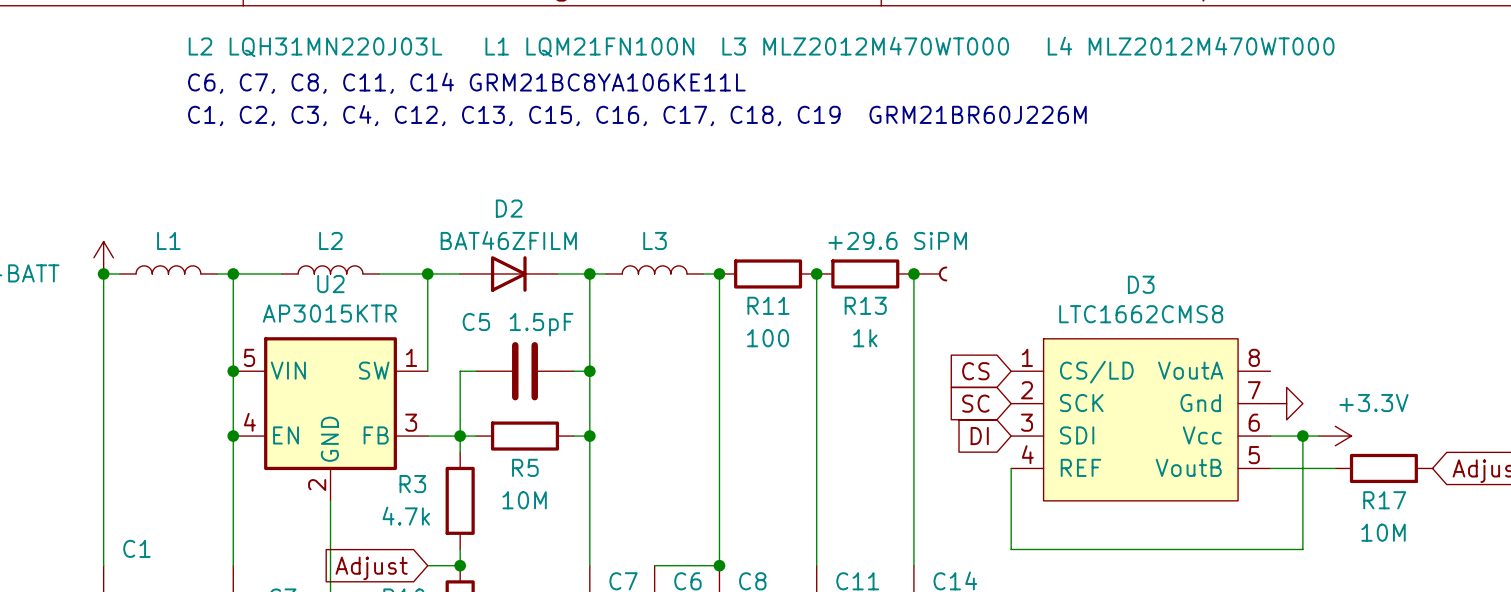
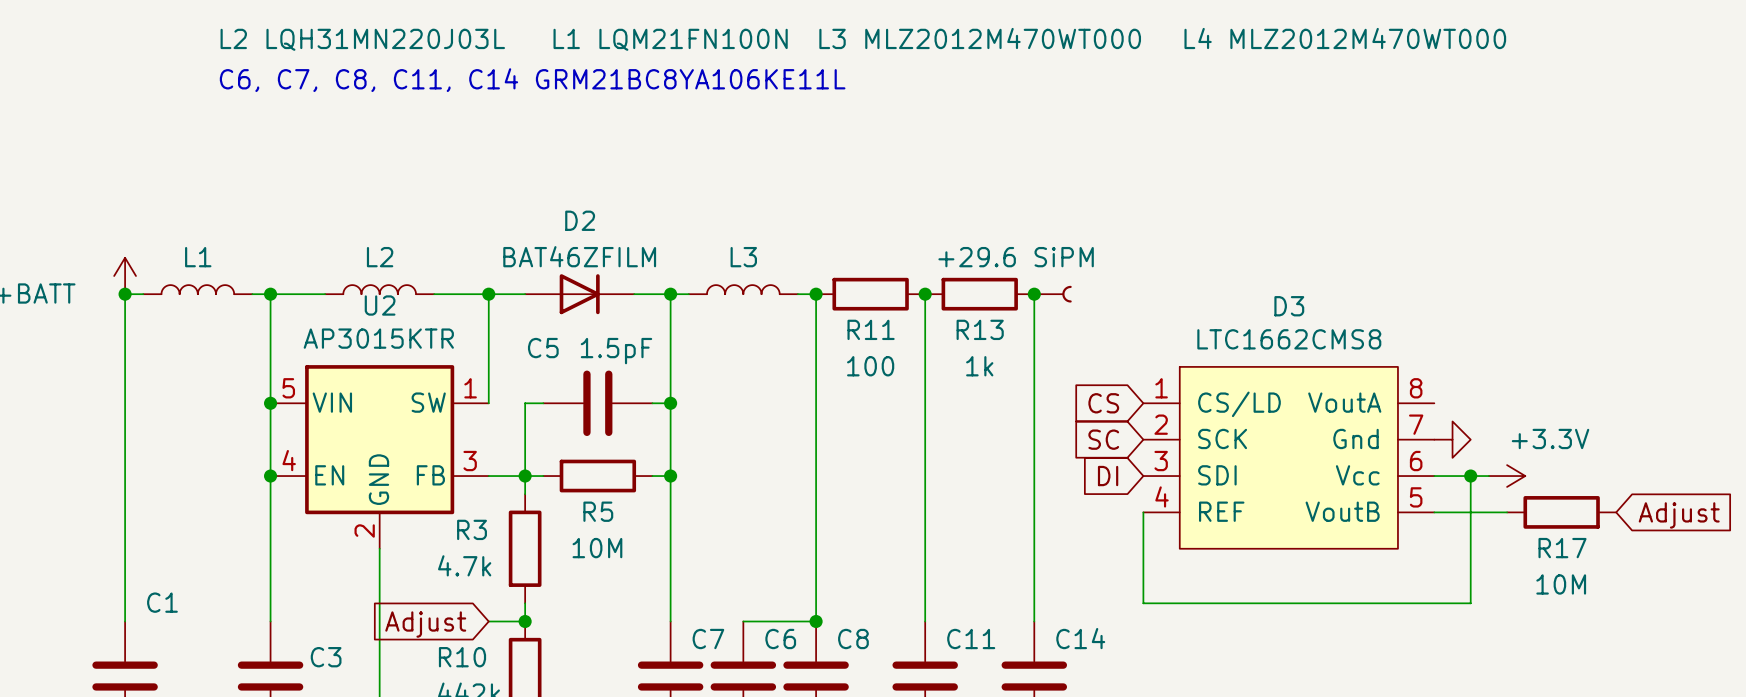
text: C1, C2, C3, C4, C12, C13, C15, C16, C17, C18, C19 GRM21BR60J226M (637, 115) -> none

